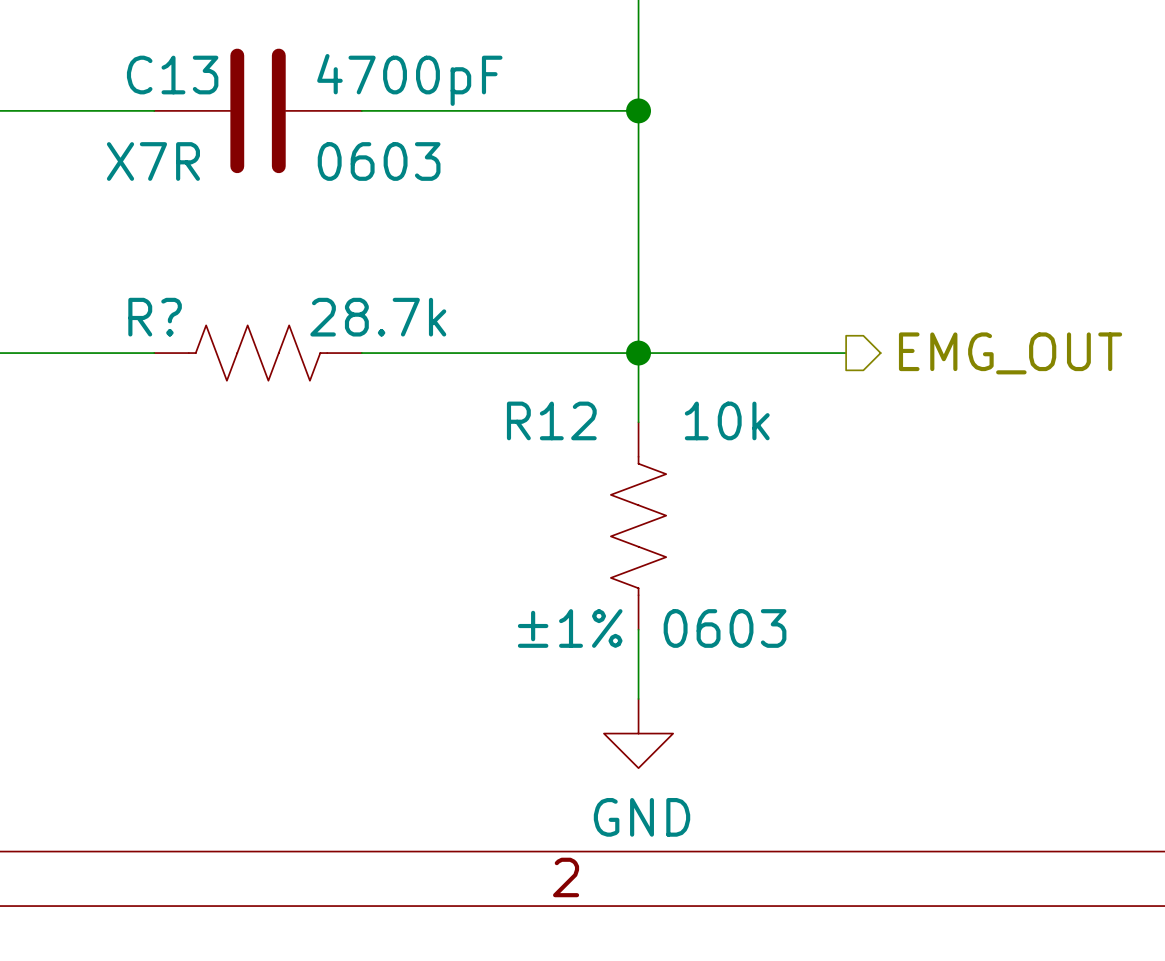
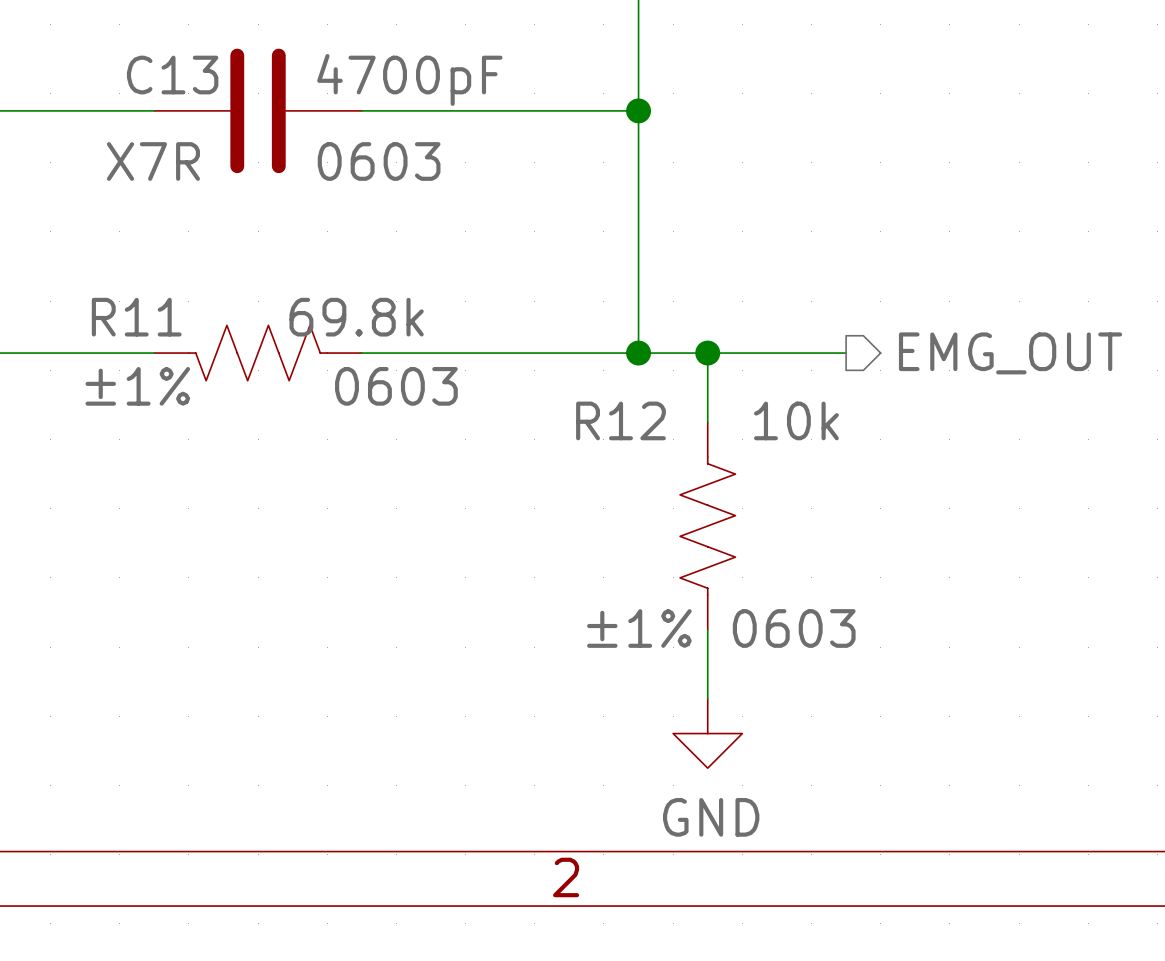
R?: 28.7k (258, 353) -> none
R11: none -> 69.8k (258, 353)
wire: (638, 353) (638, 422) -> (707, 353) (707, 422)
junction: none -> (707, 353)
R12 position: (638, 526) -> (707, 526)
wire: (638, 629) (638, 698) -> (707, 629) (707, 698)
power symbol position: GND (638, 733) -> GND (707, 733)

